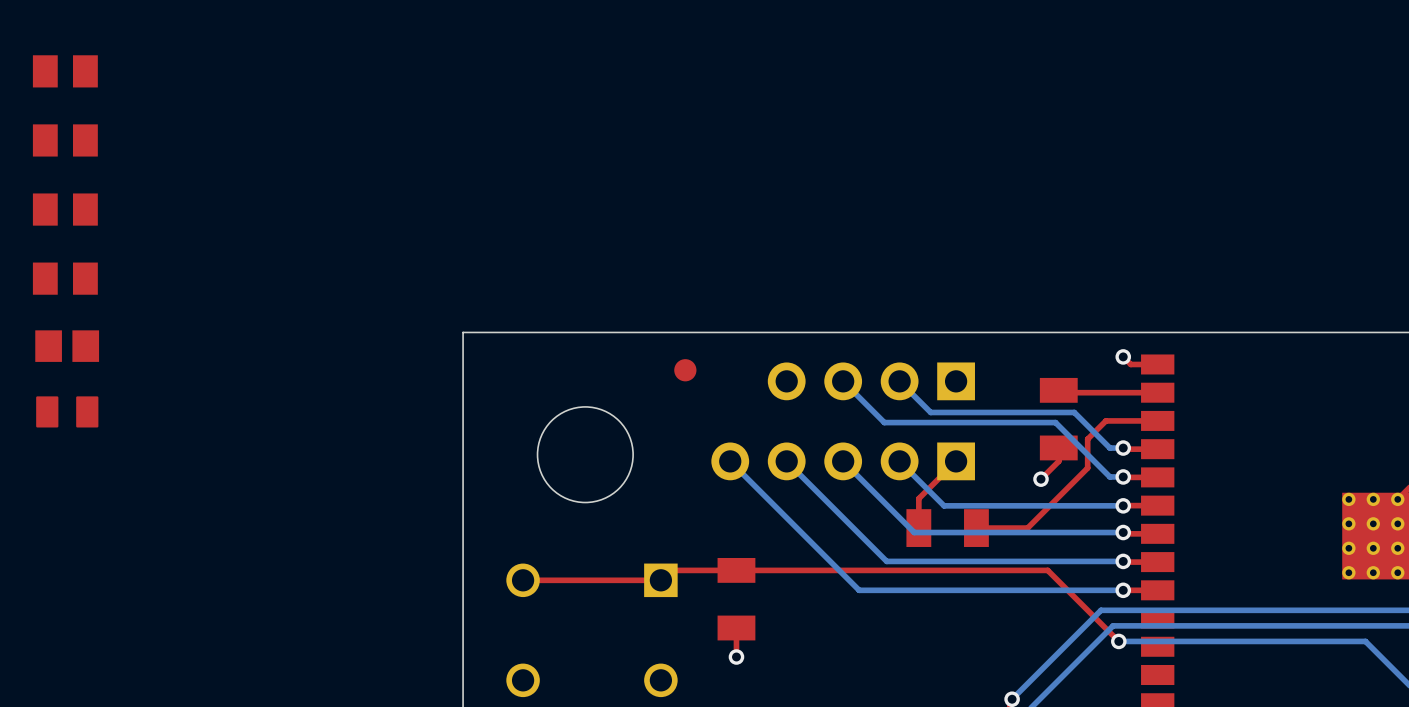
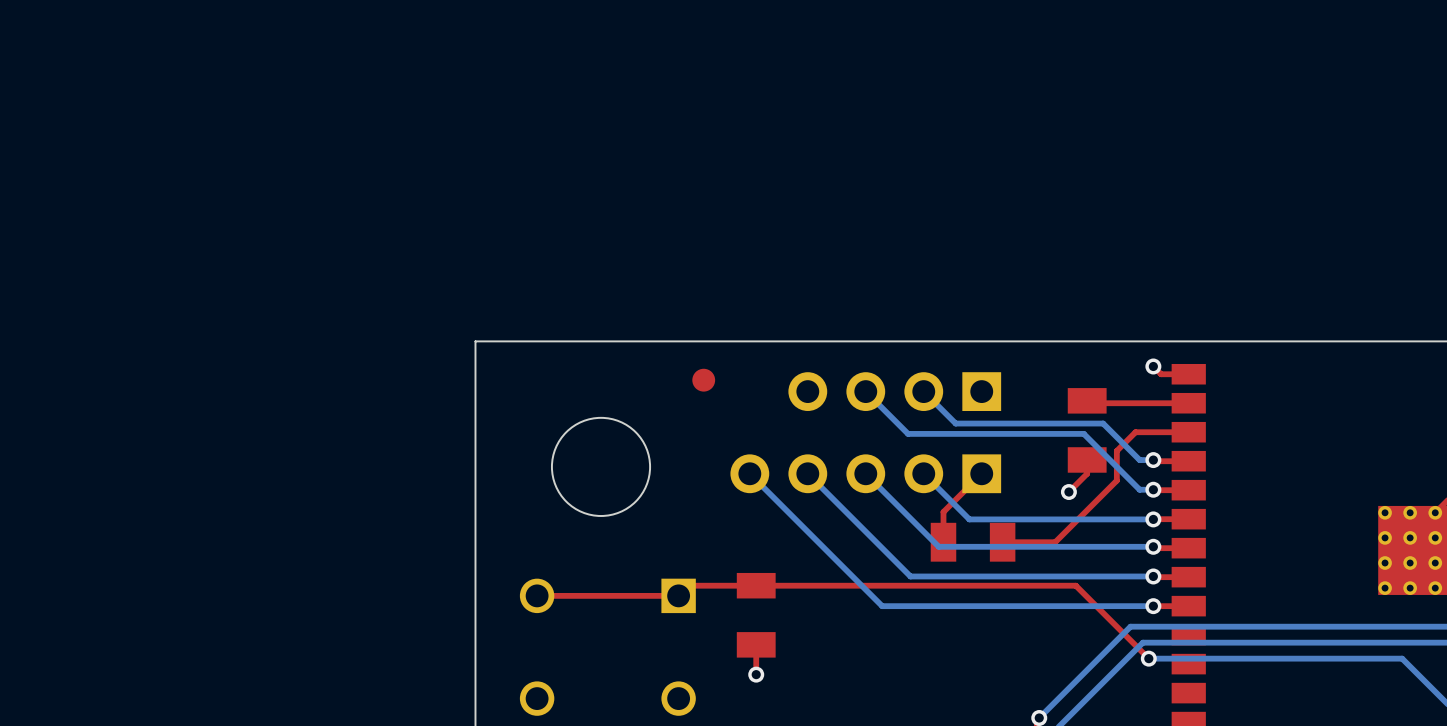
part: (65, 71) -> none
part: (65, 140) -> none
part: (65, 209) -> none
part: (65, 278) -> none
part: (67, 346) -> none
part: (67, 411) -> none

